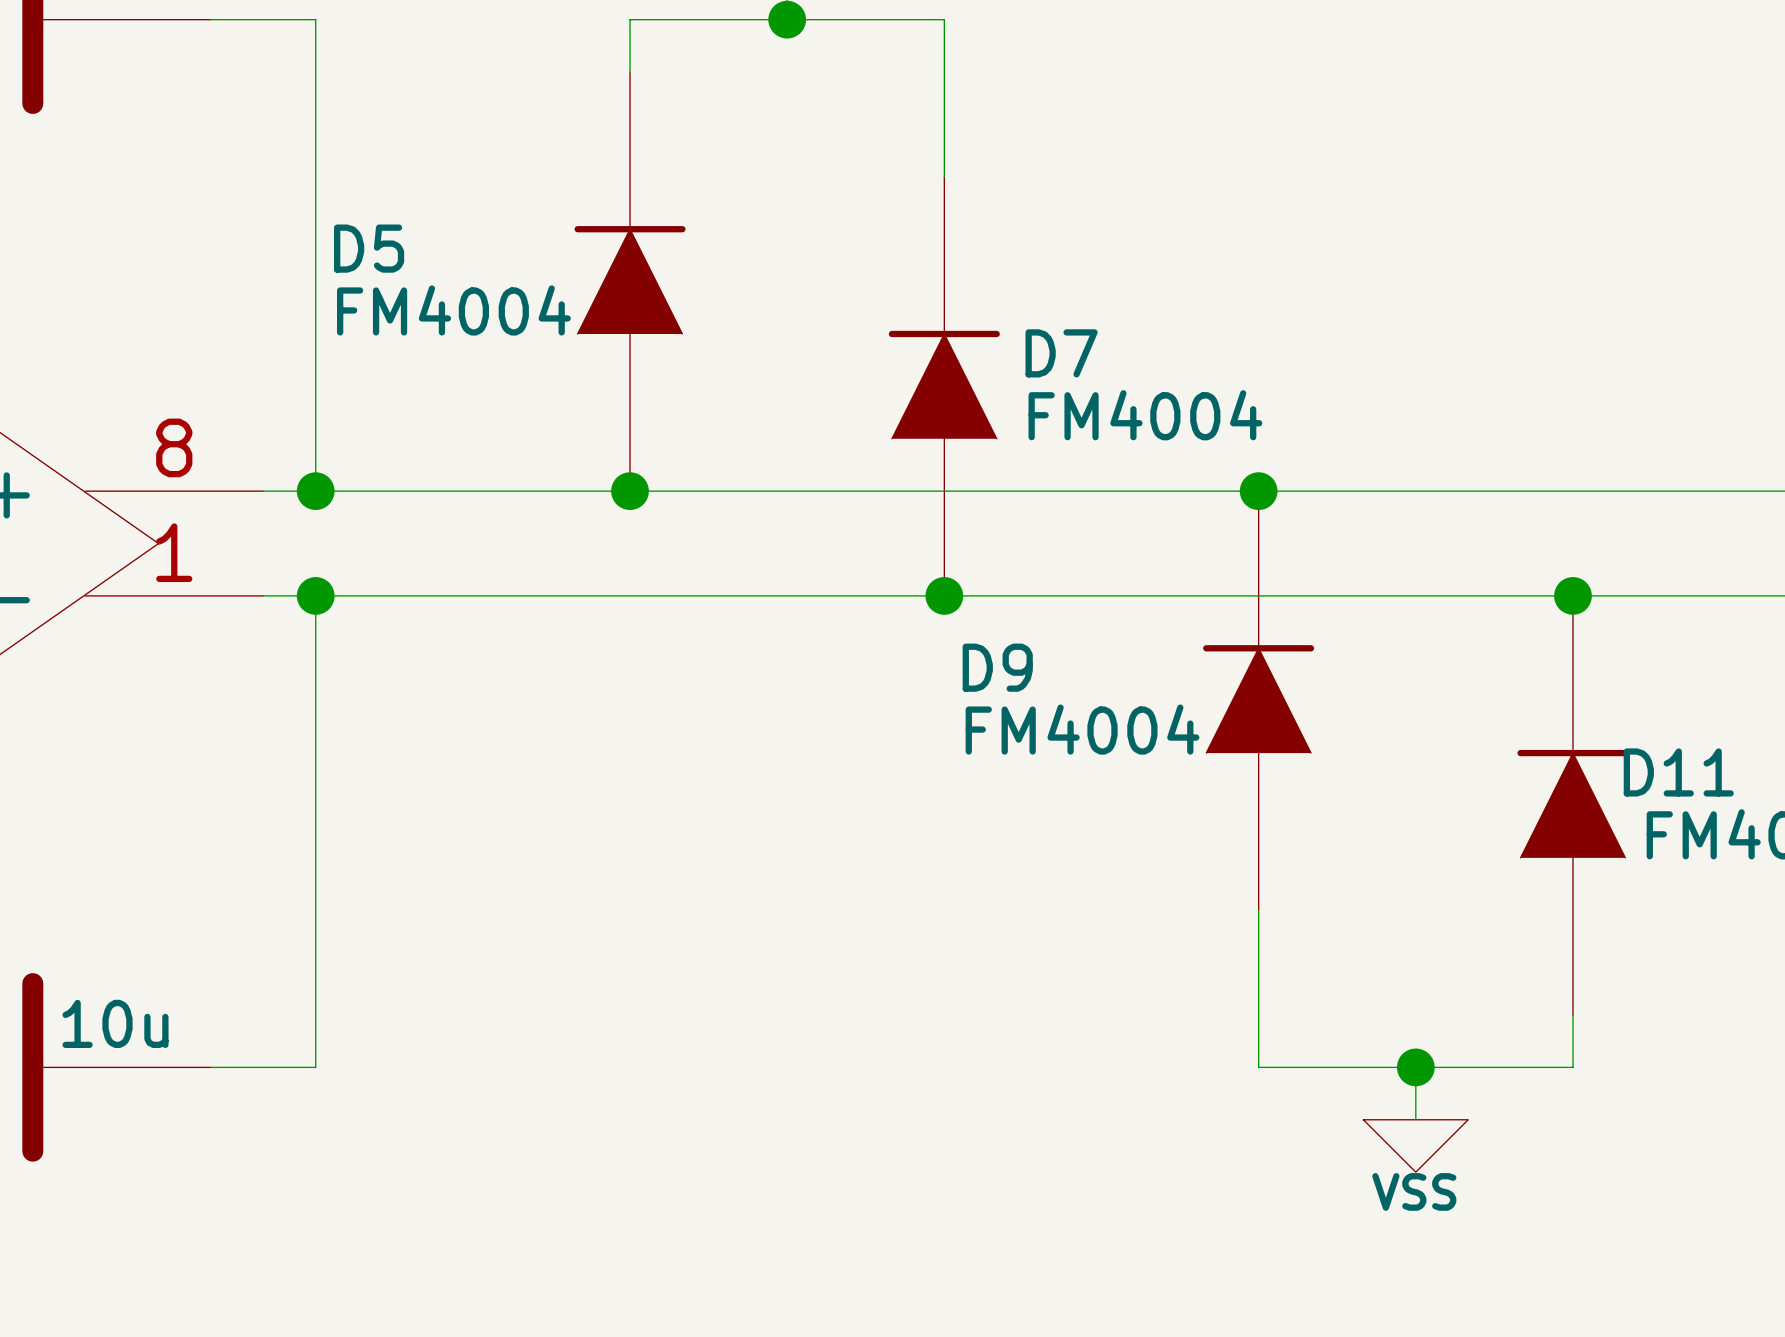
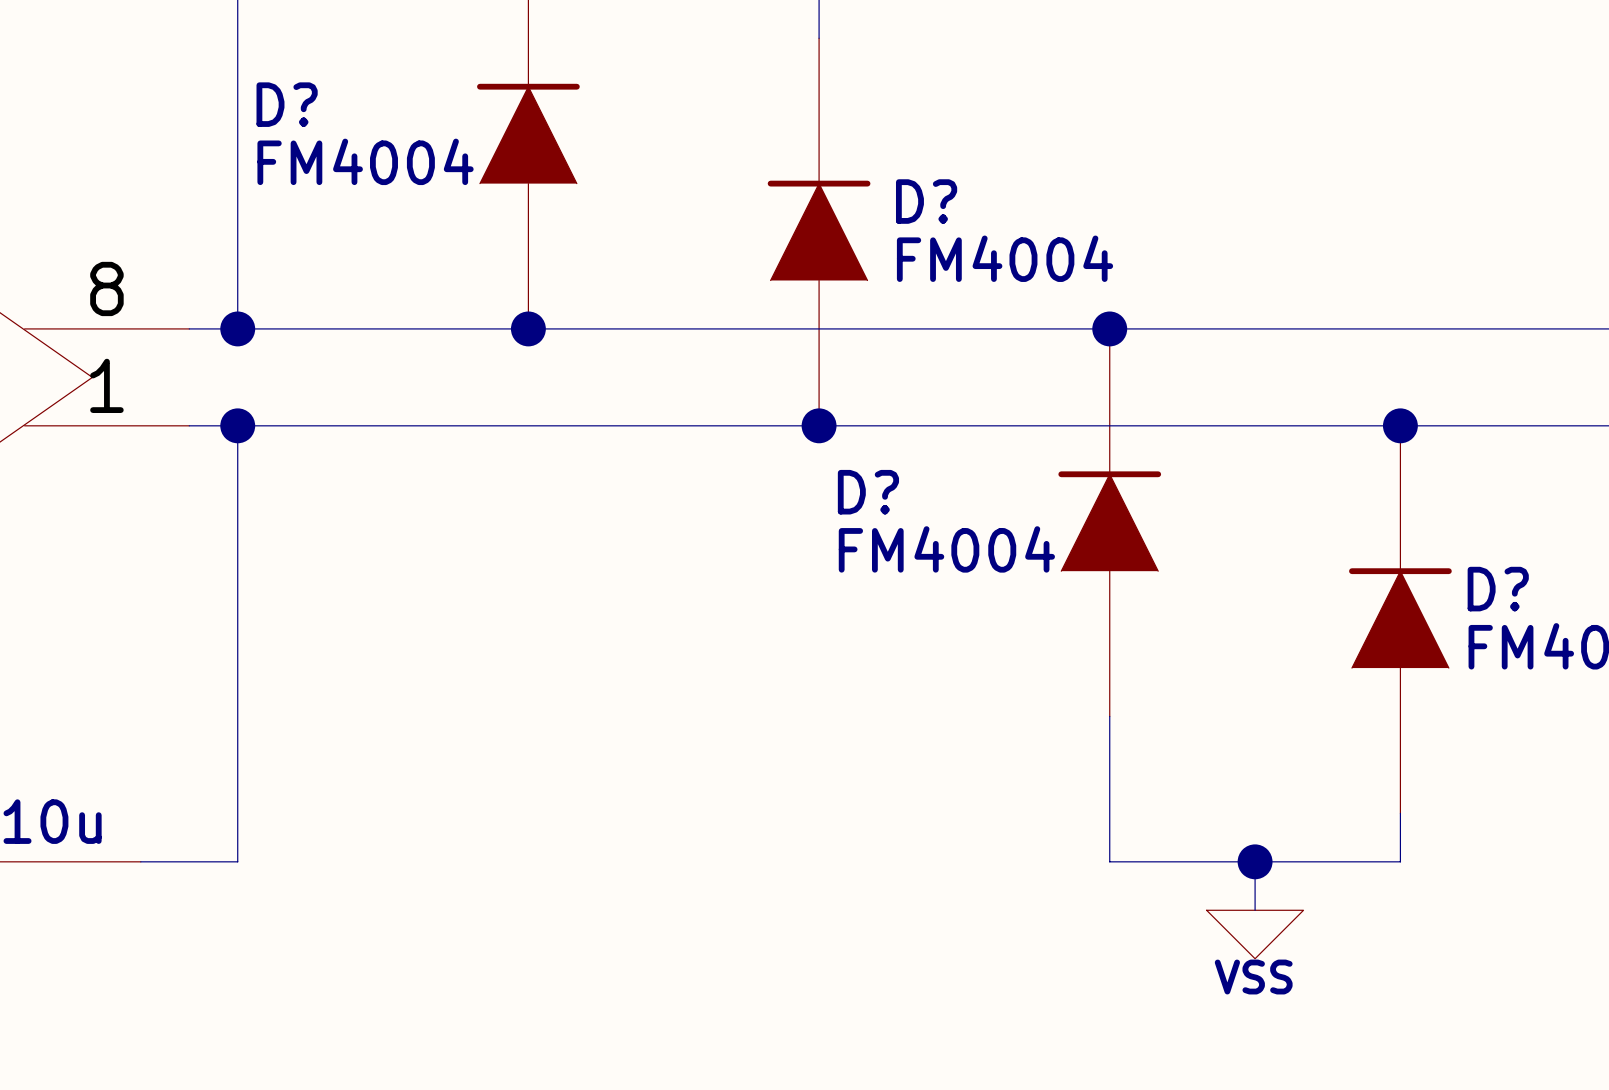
D5 name: D5 (369, 248) -> D? (287, 104)
D7 name: D7 (1061, 353) -> D? (926, 201)
D9 name: D9 (997, 667) -> D? (868, 492)
D11 name: D11 (1678, 772) -> D? (1498, 589)

